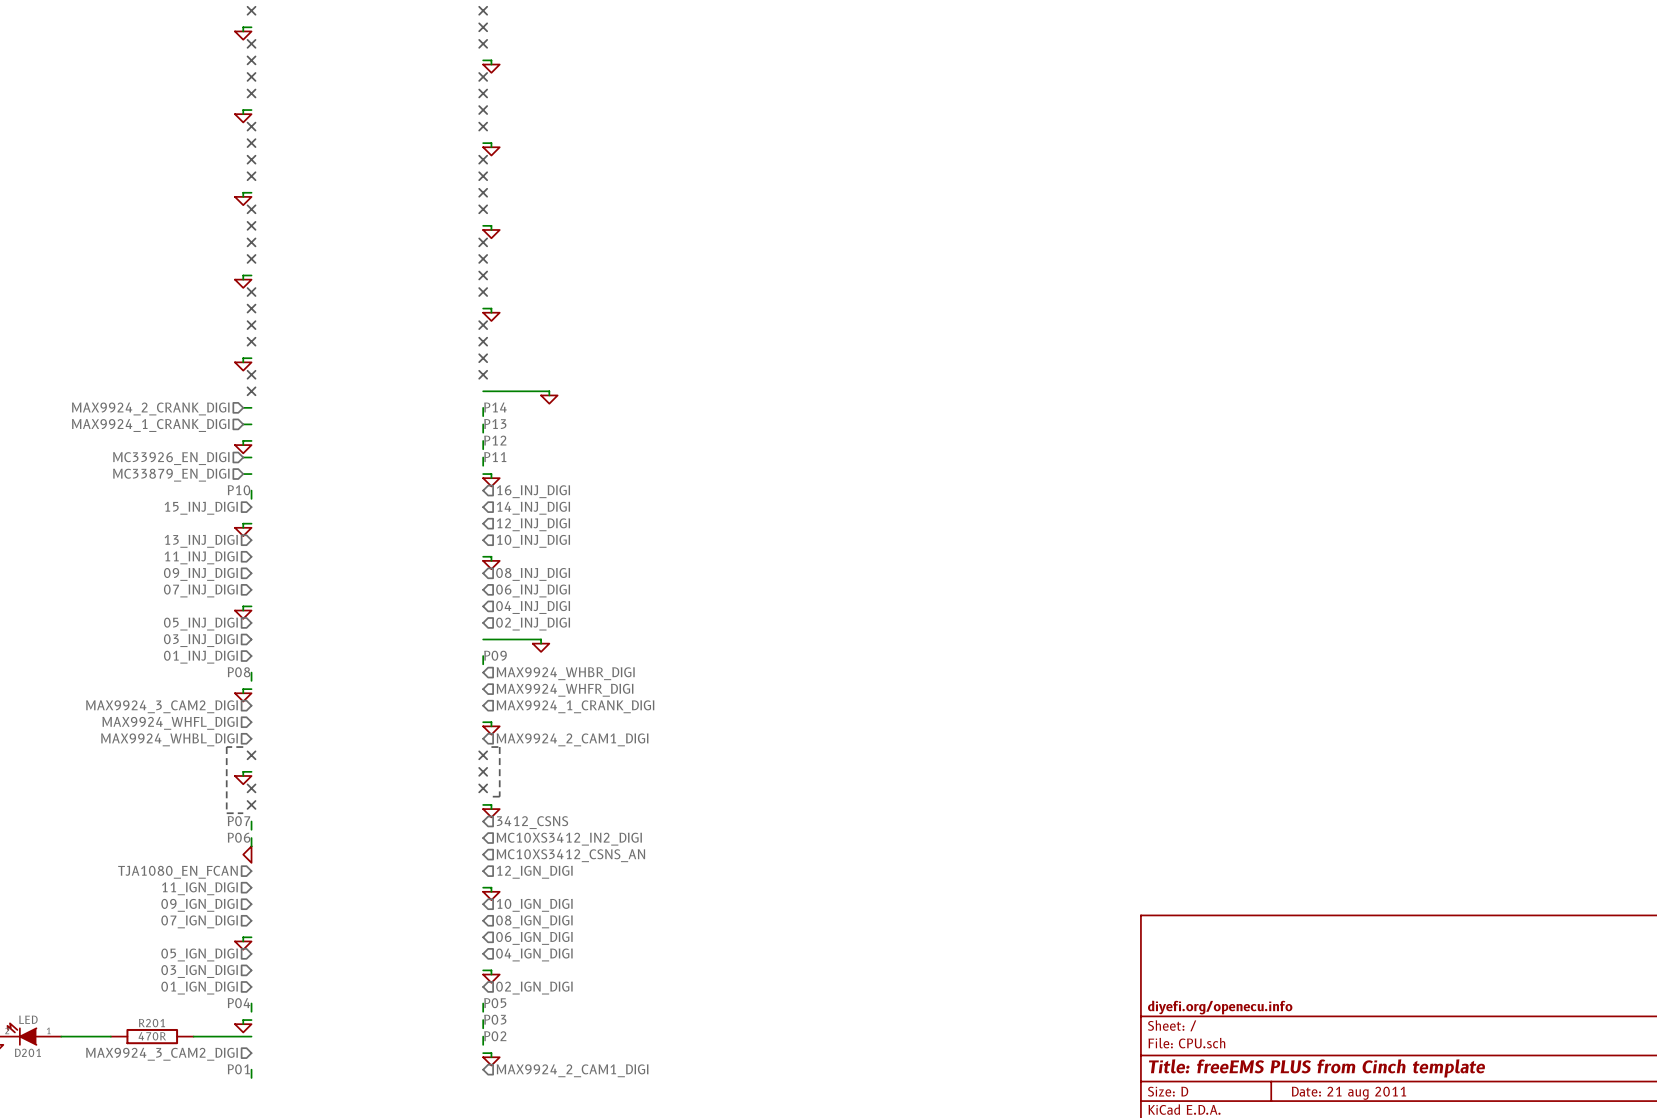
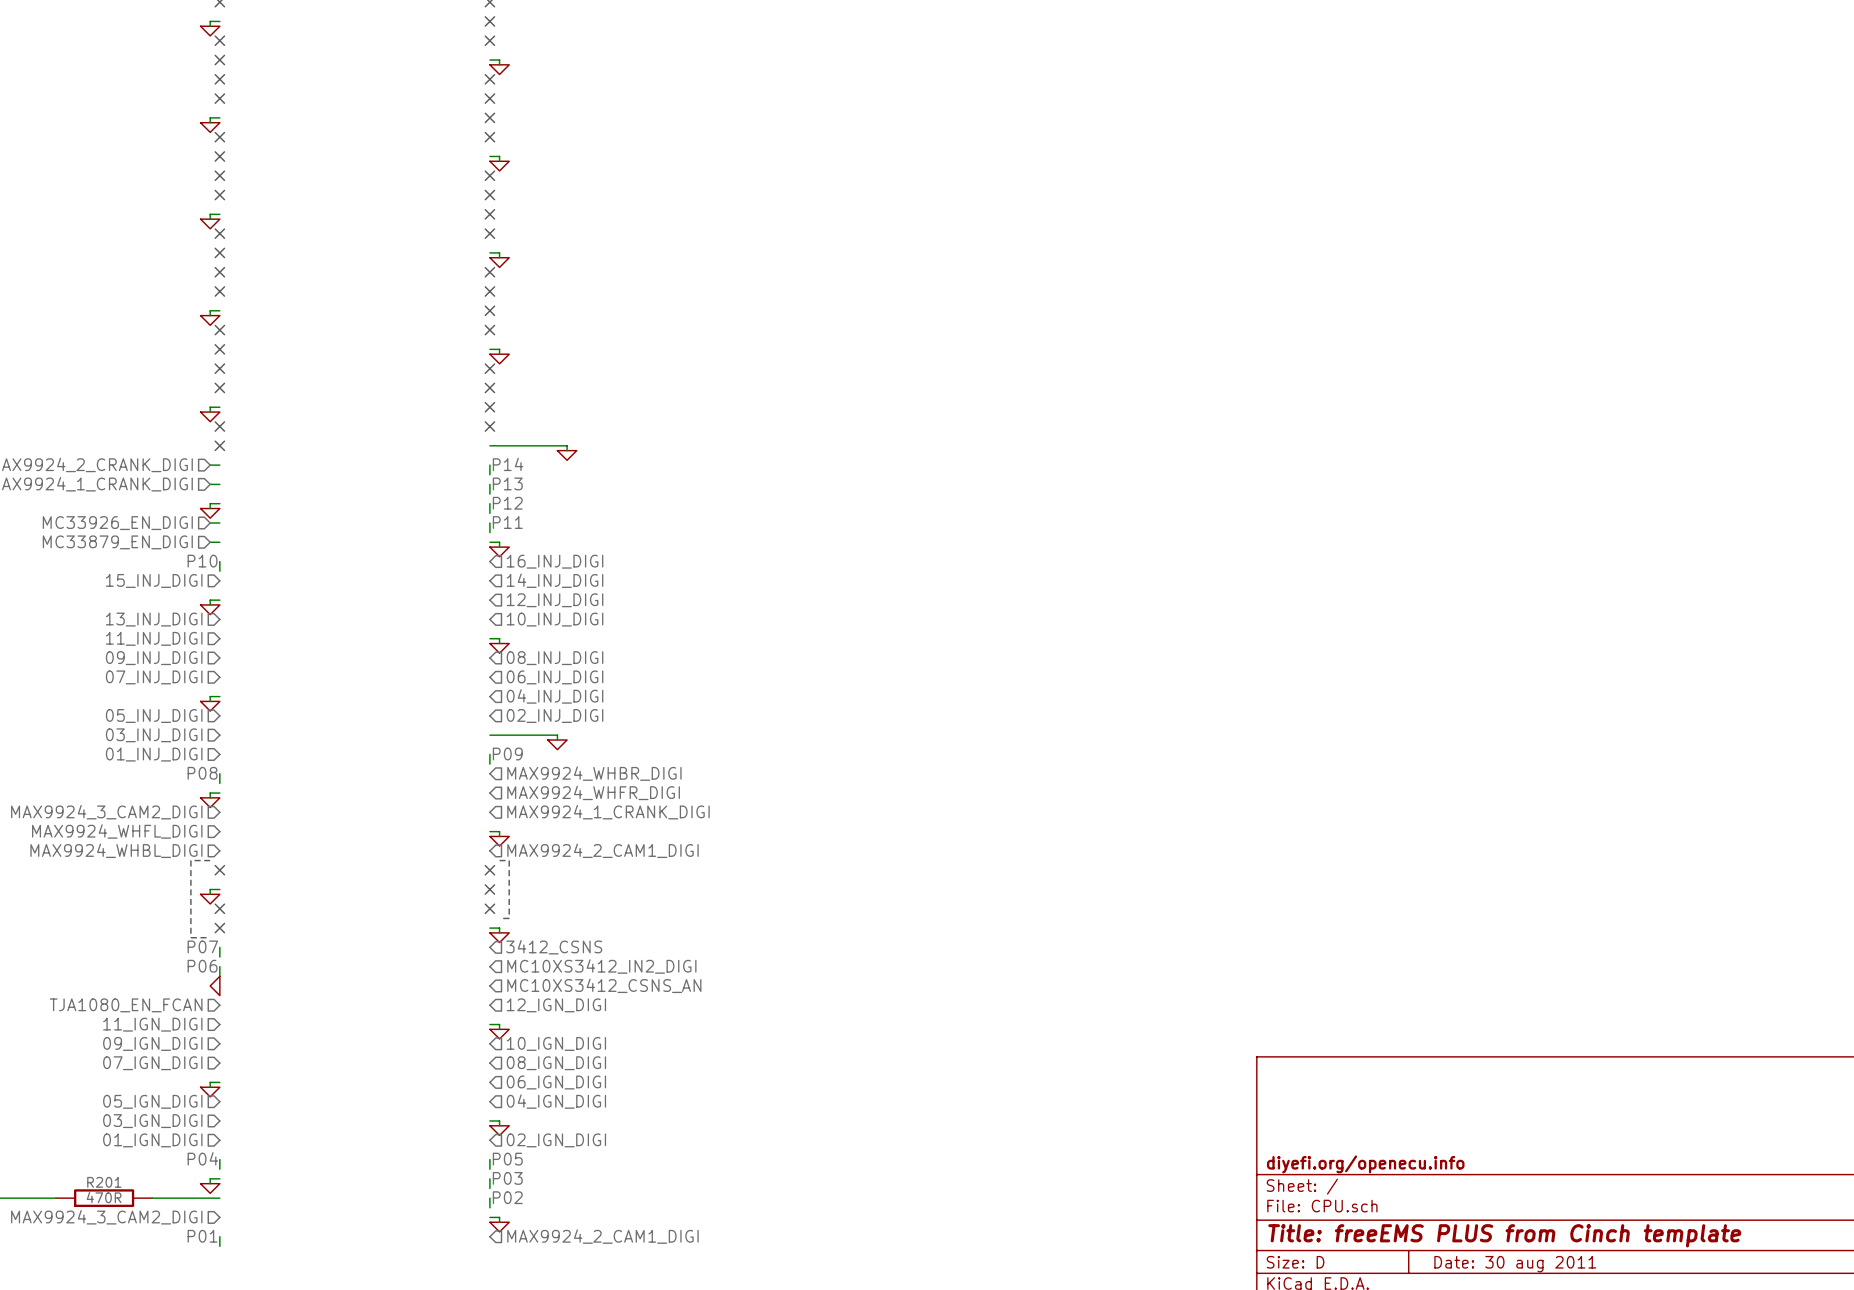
title block: Date: 21 aug 2011 (1349, 1093) -> Date: 30 aug 2011 (1515, 1264)

